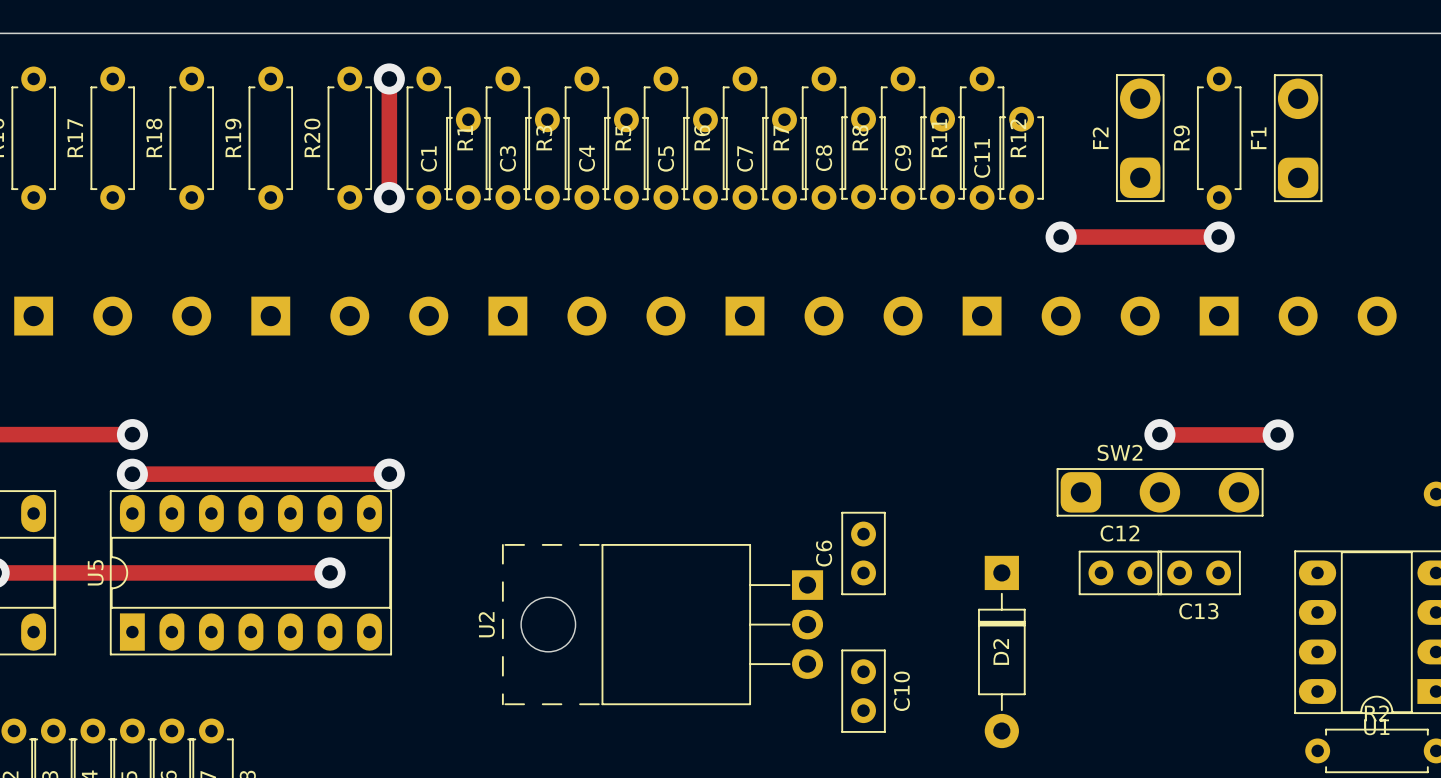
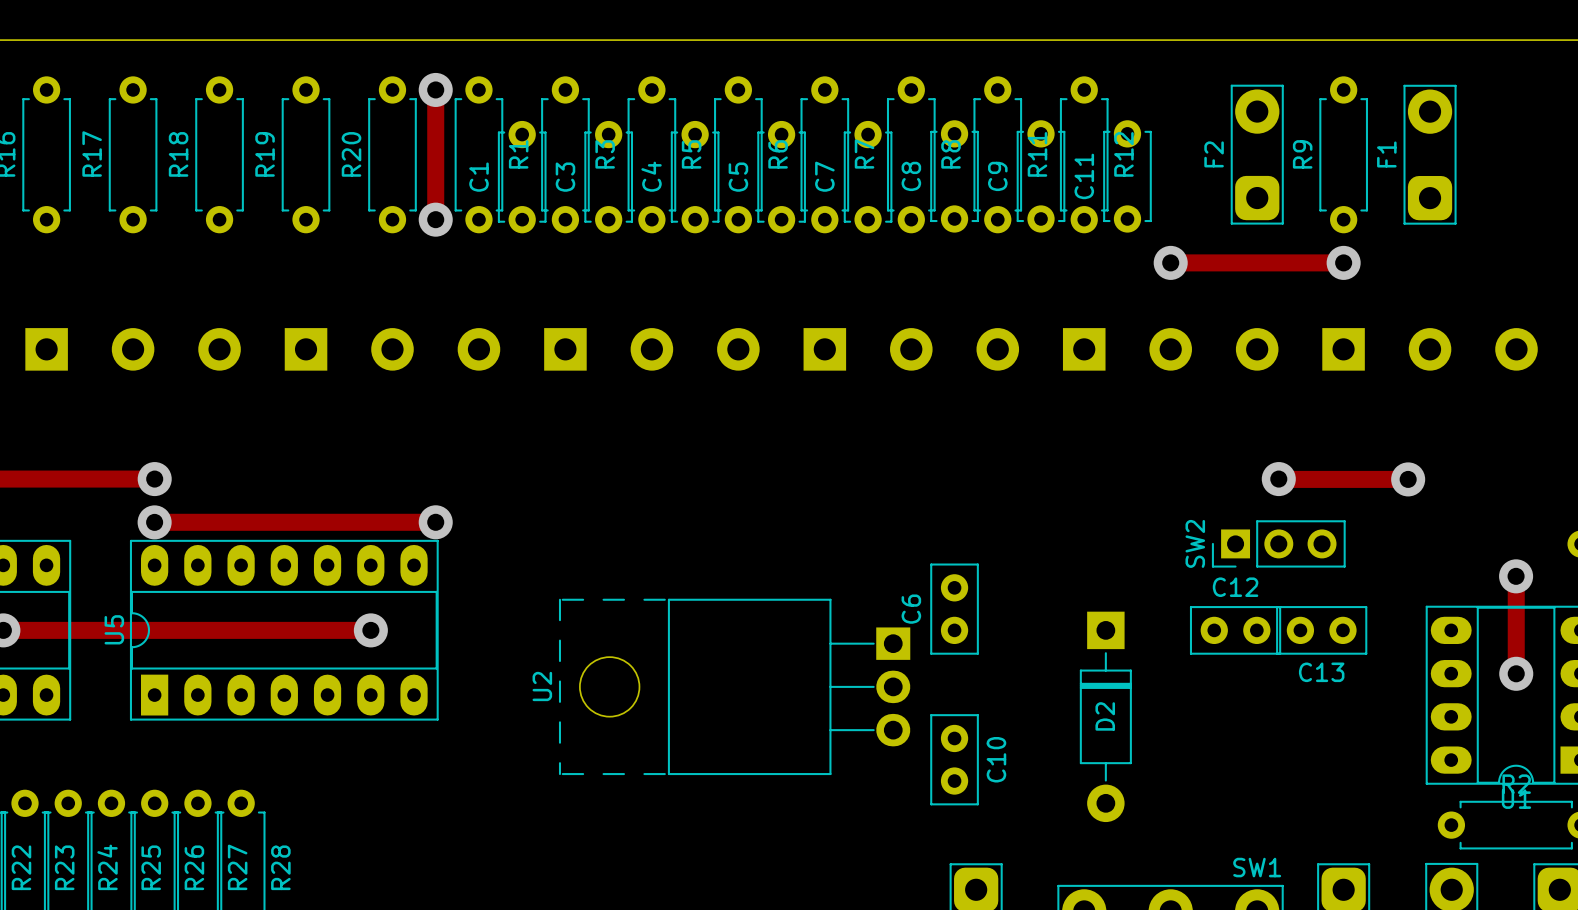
SW2 name position: SW2 (1120, 452) -> SW2 (1195, 543)
SW2 footprint: [1056, 468, 1264, 517] -> [1211, 520, 1346, 568]
track: none -> (1516, 576) (1516, 673)
via: none -> (1516, 576)
via: none -> (1516, 673)

